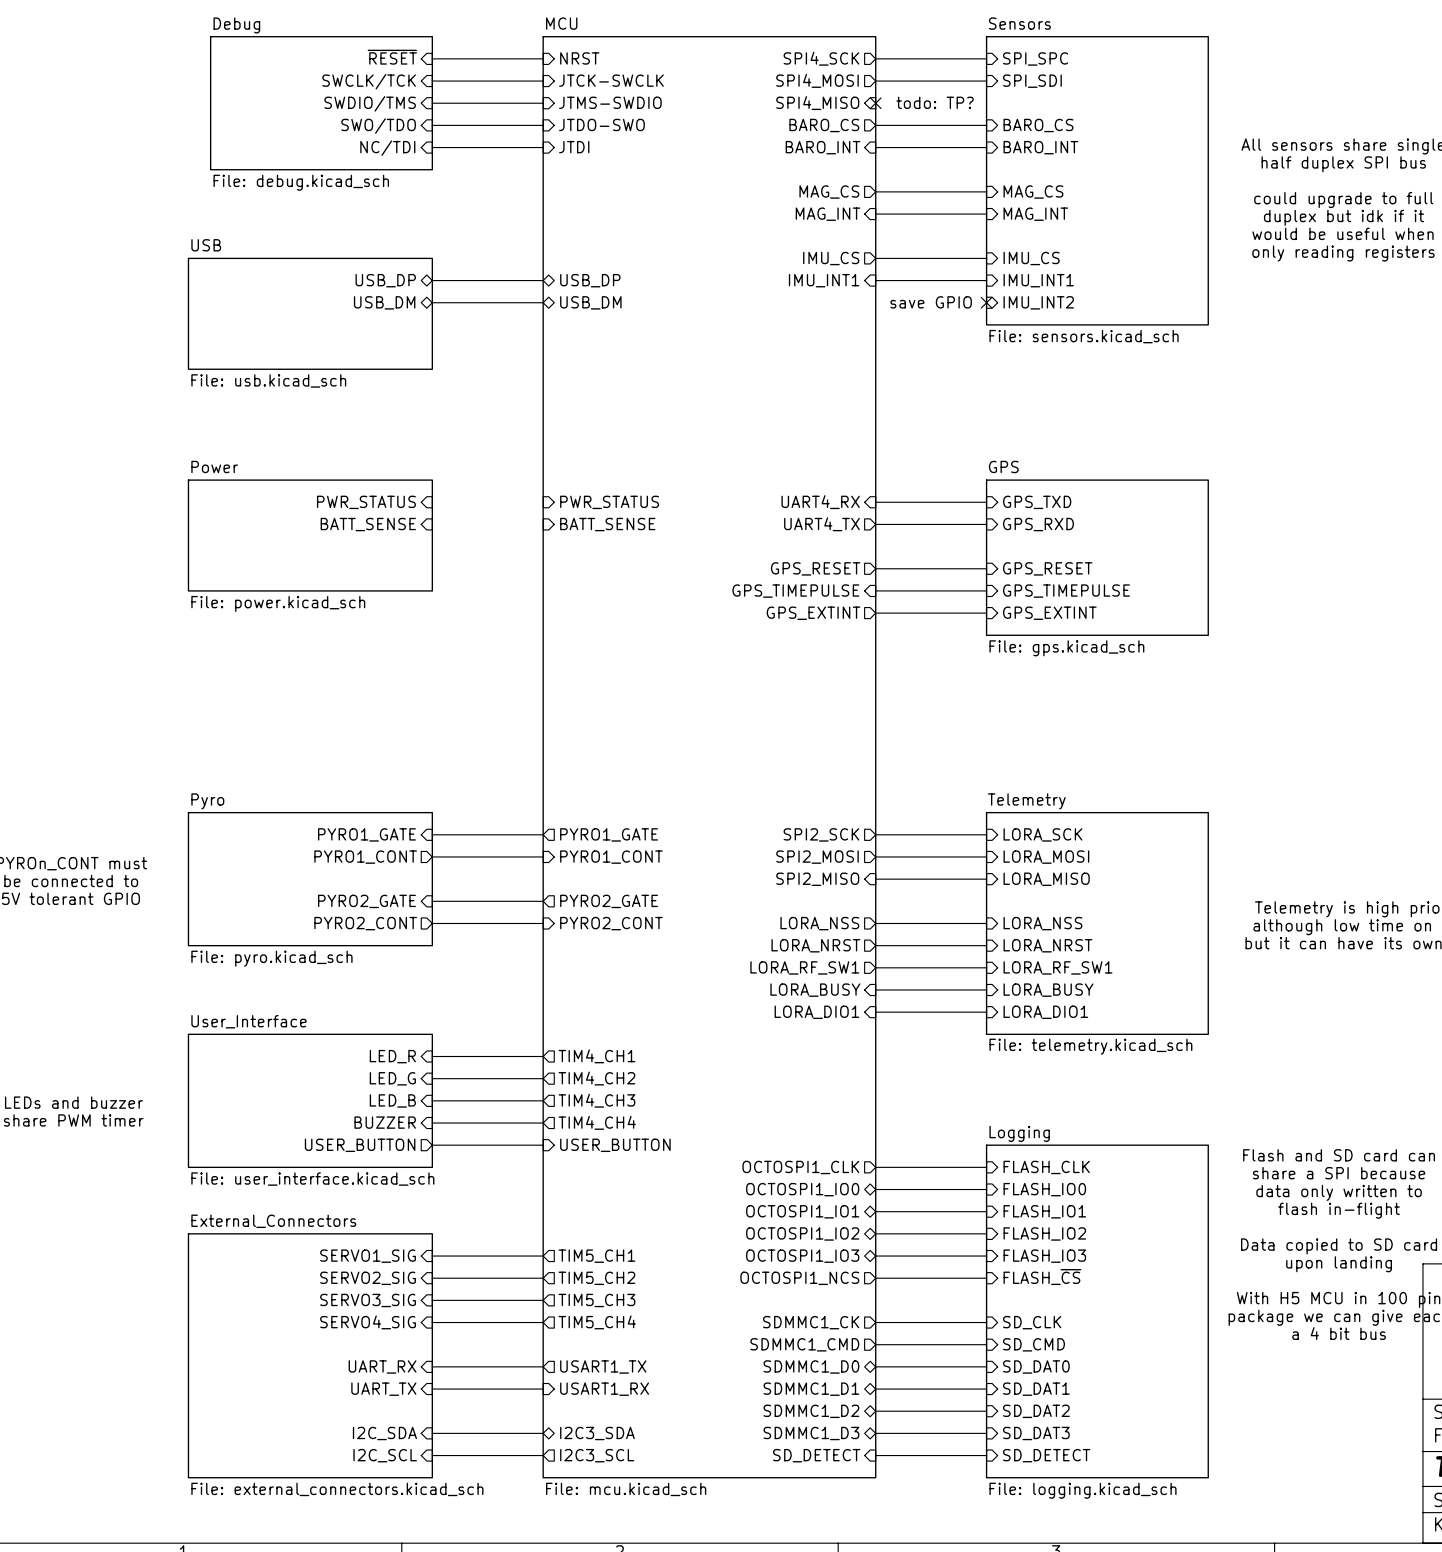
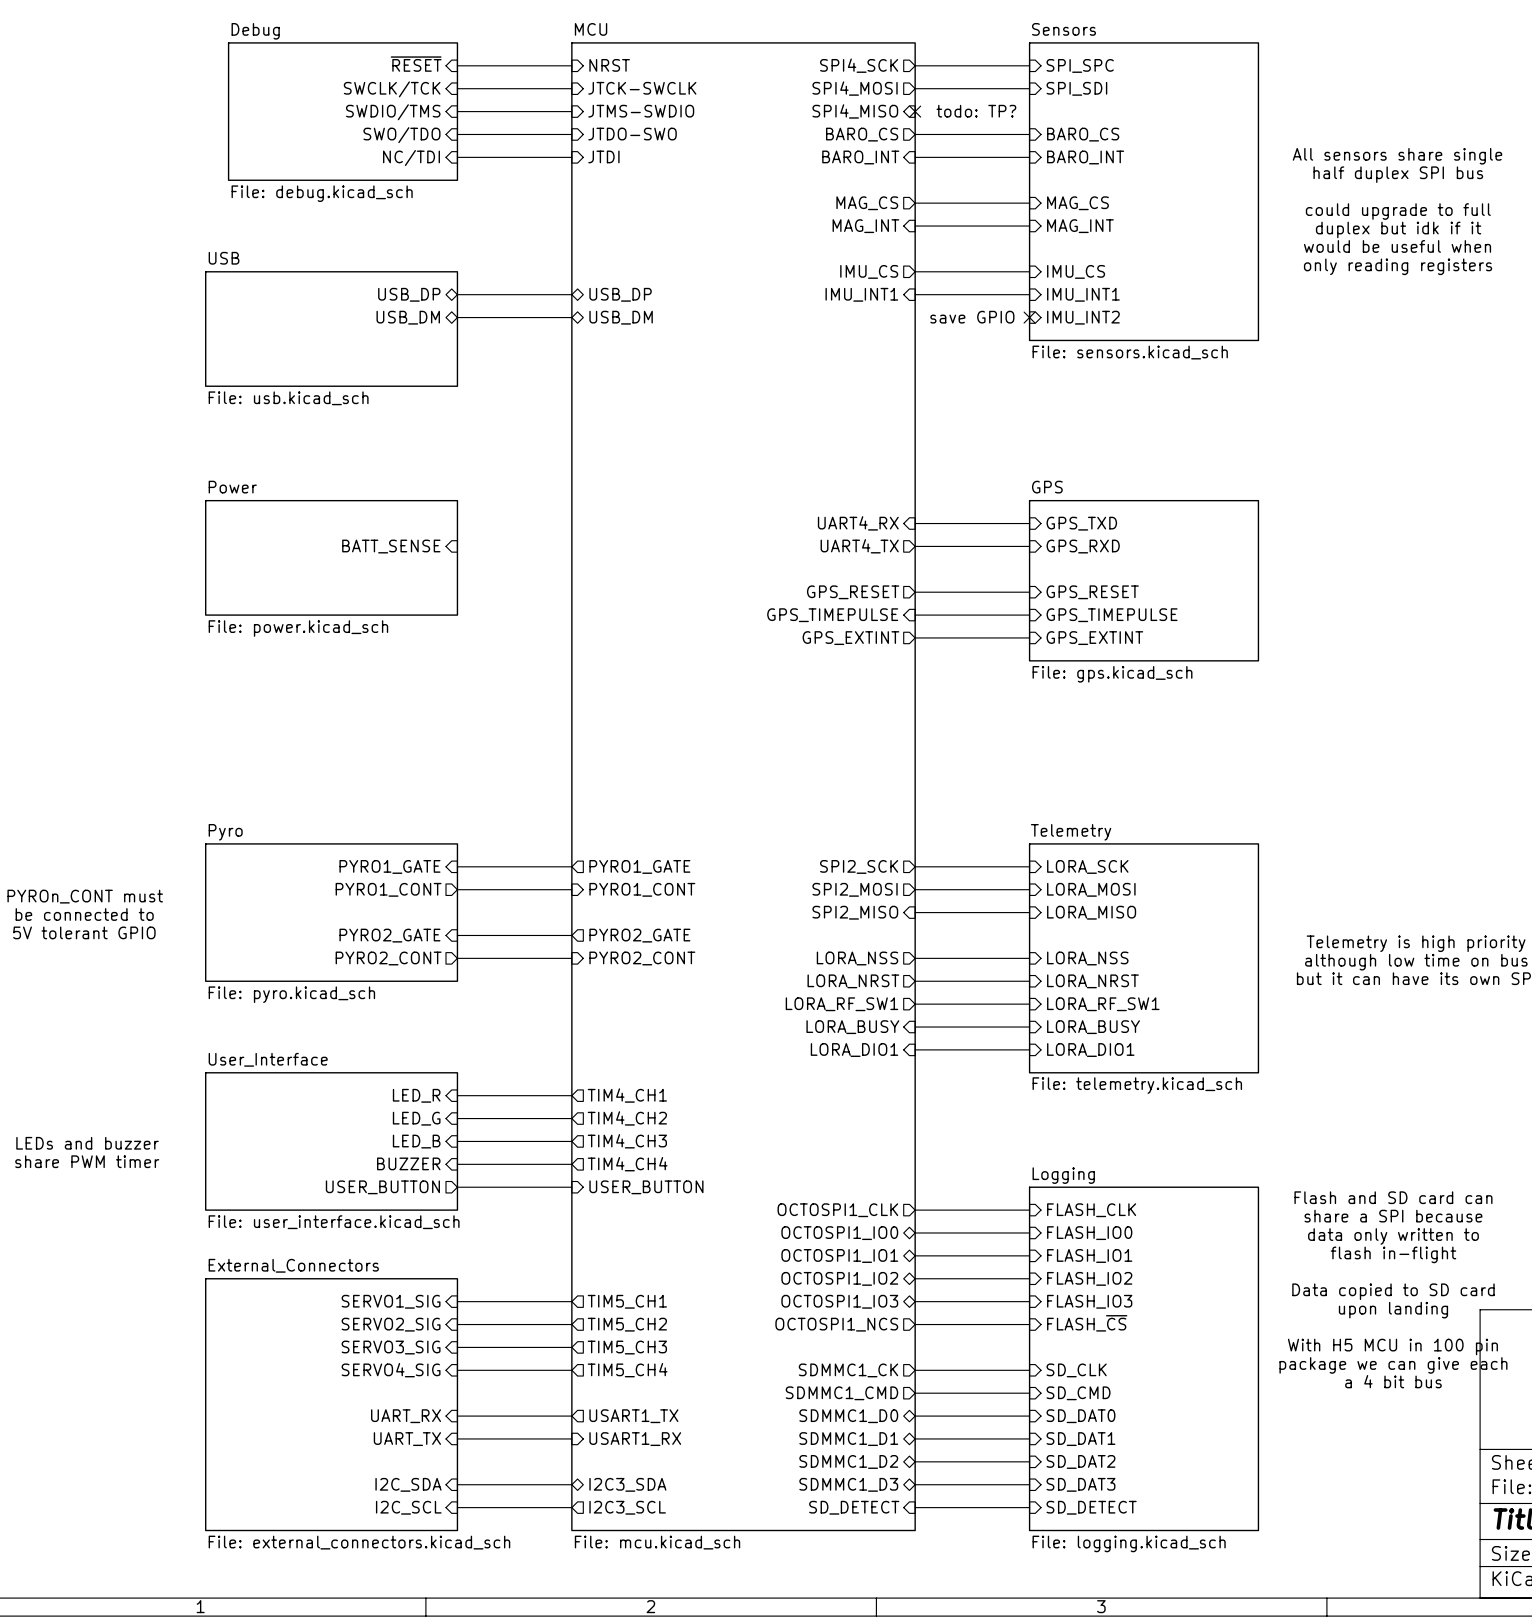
sheet pin: PWR_STATUS (366, 502) -> none
sheet pin: PWR_STATUS (609, 502) -> none
sheet pin: BATT_SENSE (607, 524) -> none

